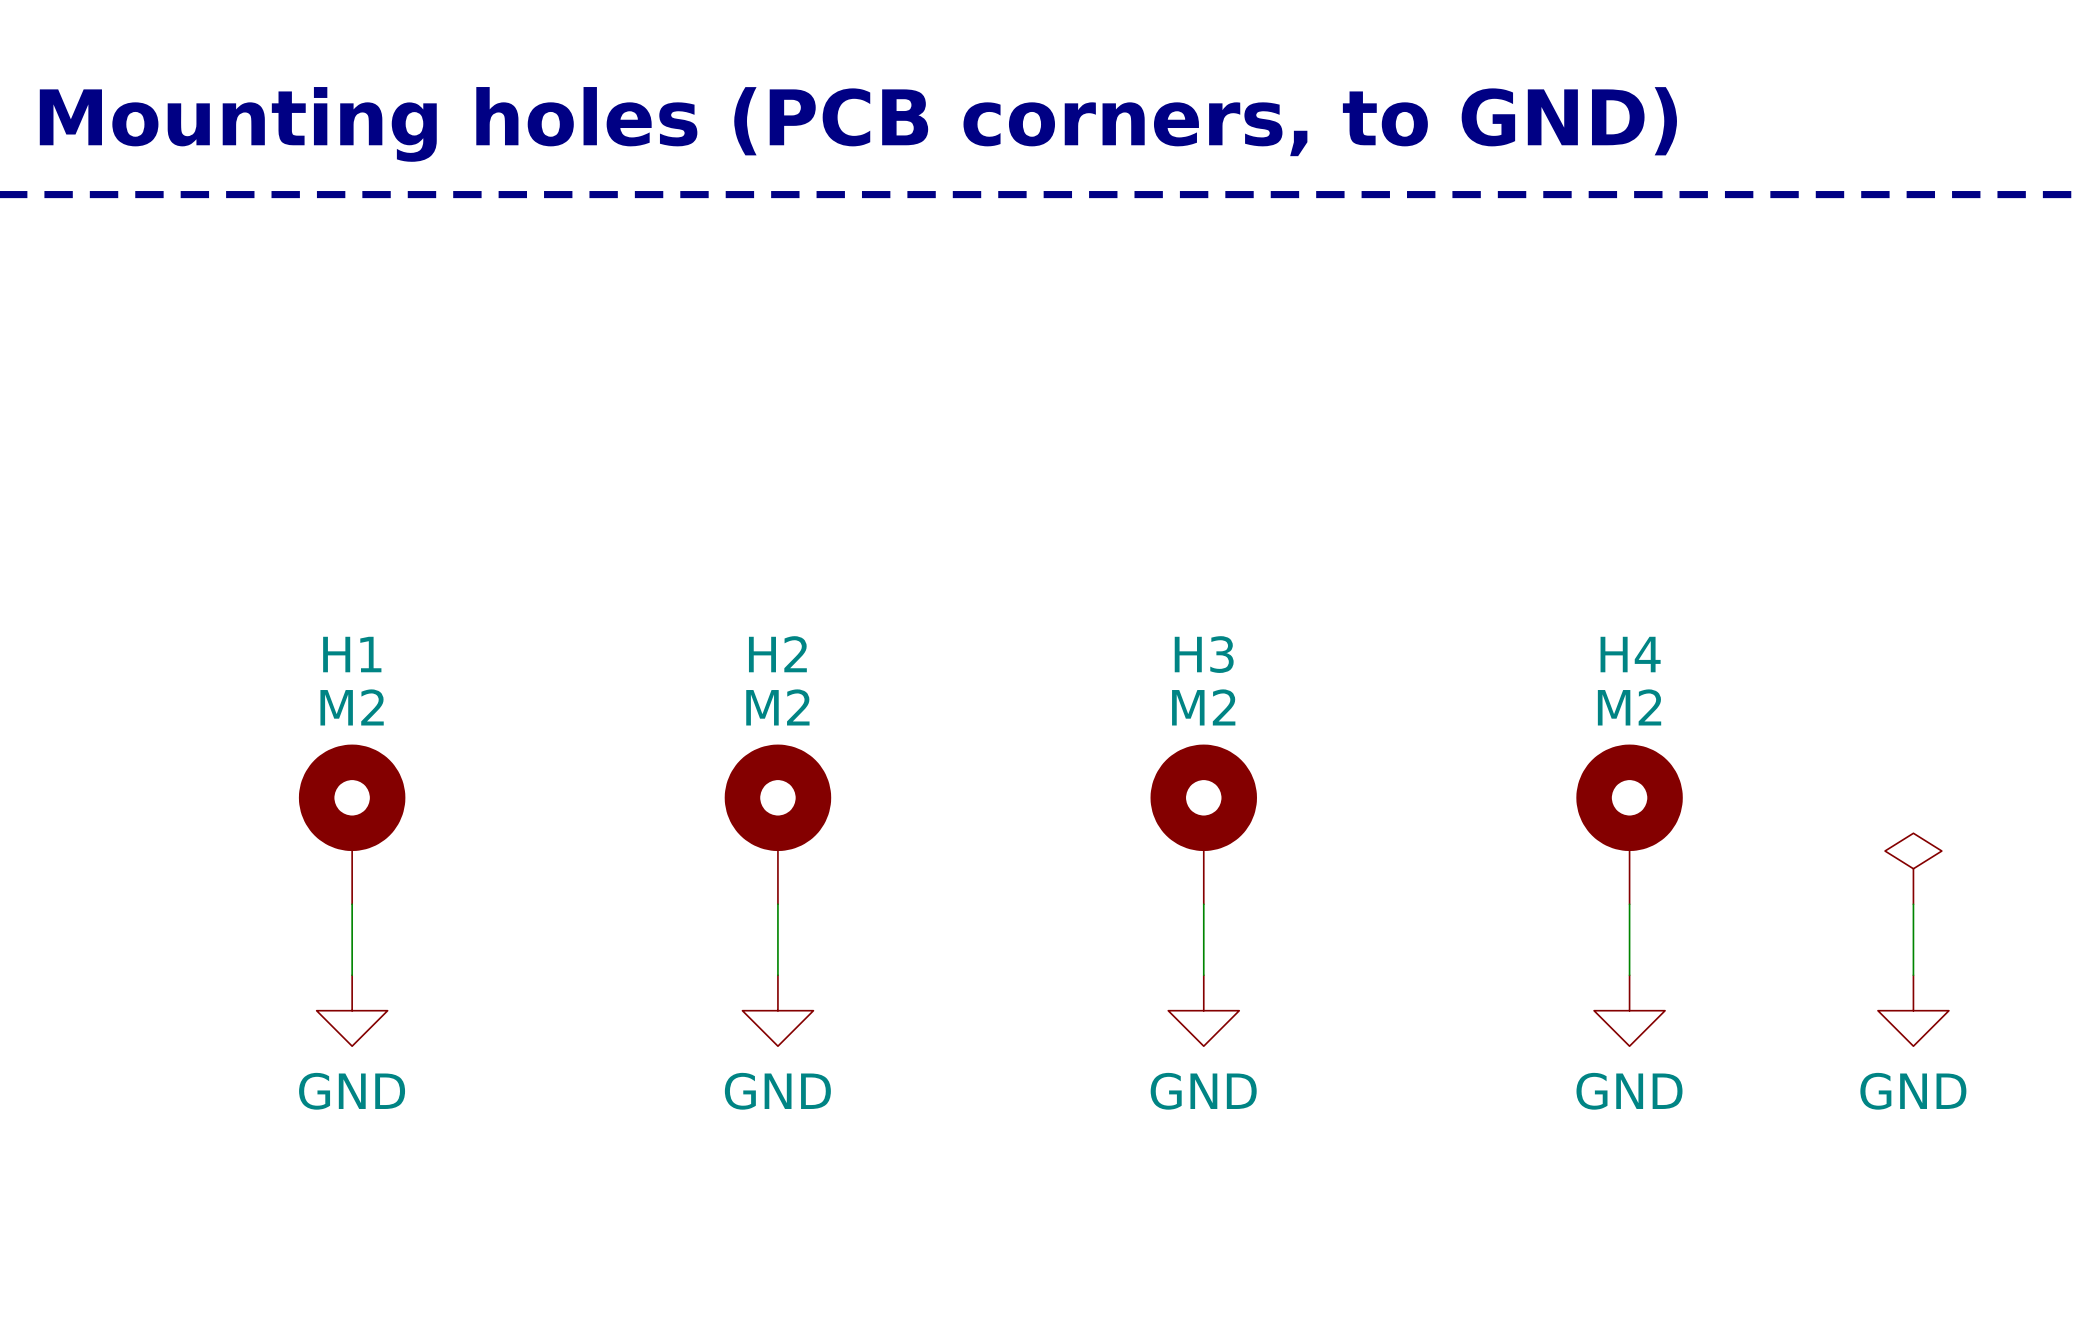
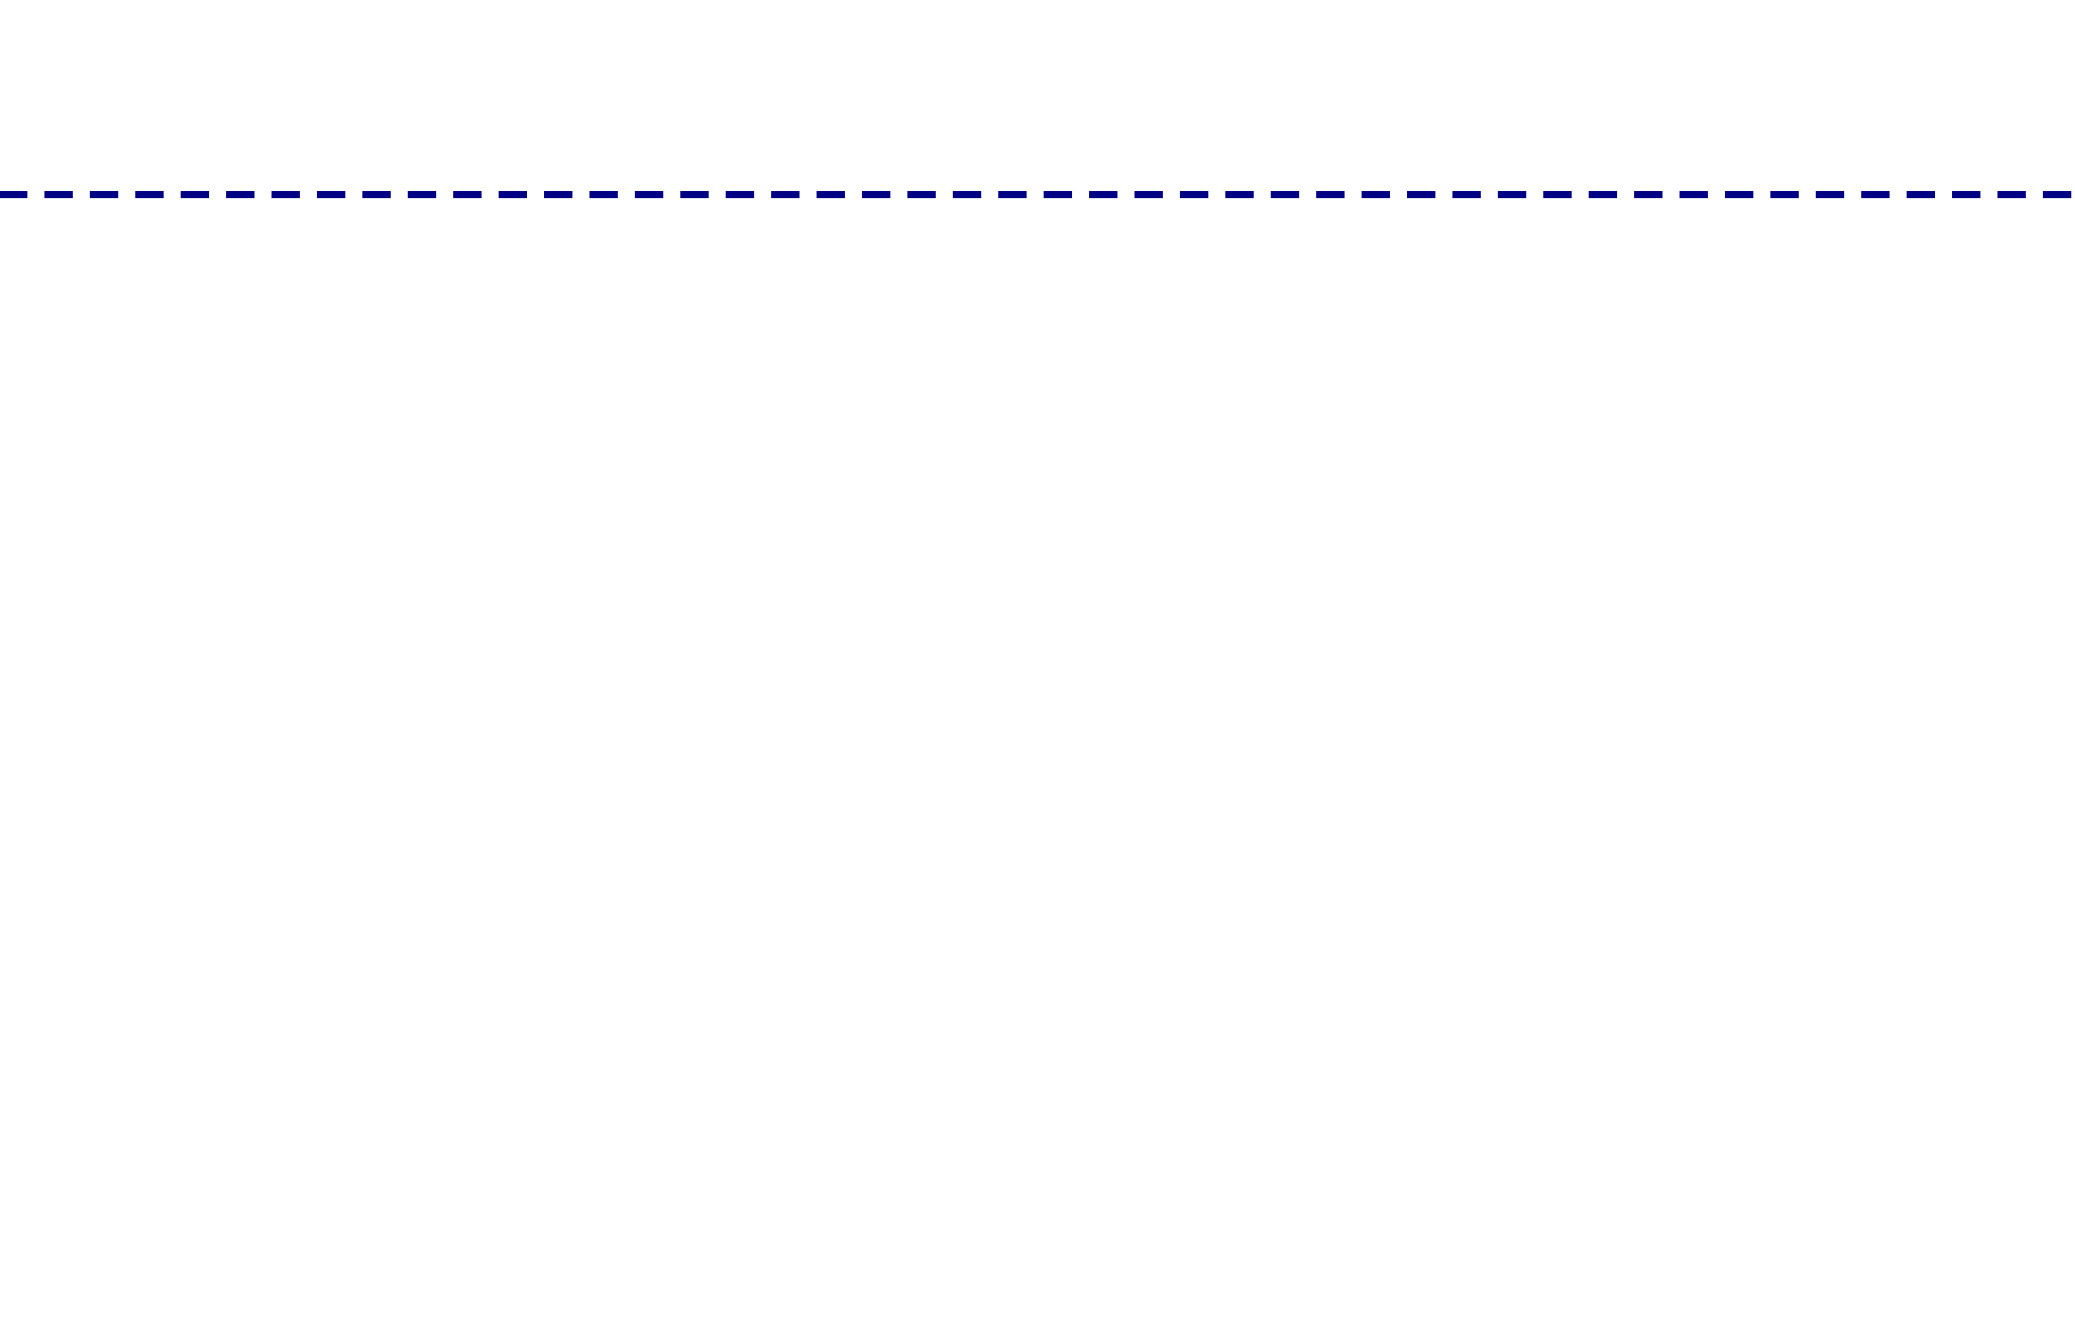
text: Mounting holes (PCB corners, to GND) (858, 124) -> none
H1: M2 (352, 824) -> none
H2: M2 (777, 824) -> none
H3: M2 (1203, 824) -> none
H4: M2 (1629, 824) -> none
power symbol: (1913, 868) -> none
wire: (352, 904) (352, 975) -> none
wire: (777, 904) (777, 975) -> none
wire: (1203, 904) (1203, 975) -> none
wire: (1629, 904) (1629, 975) -> none
wire: (1913, 904) (1913, 975) -> none
power symbol: GND (352, 1010) -> none
power symbol: GND (777, 1010) -> none
power symbol: GND (1203, 1010) -> none
power symbol: GND (1629, 1010) -> none
power symbol: GND (1913, 1010) -> none

